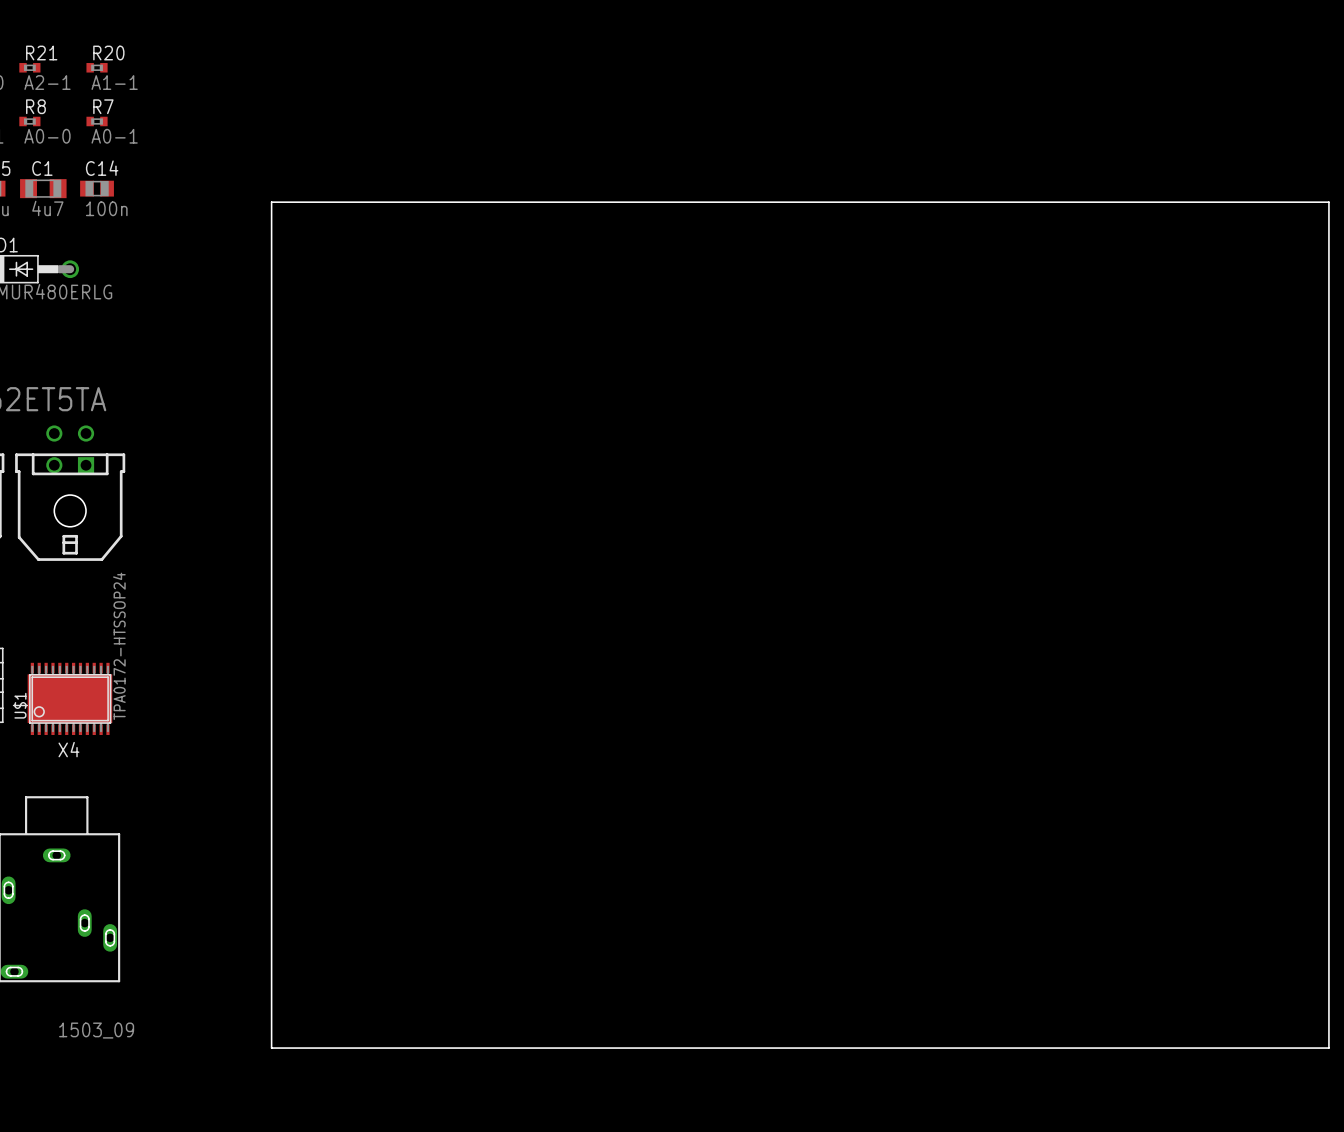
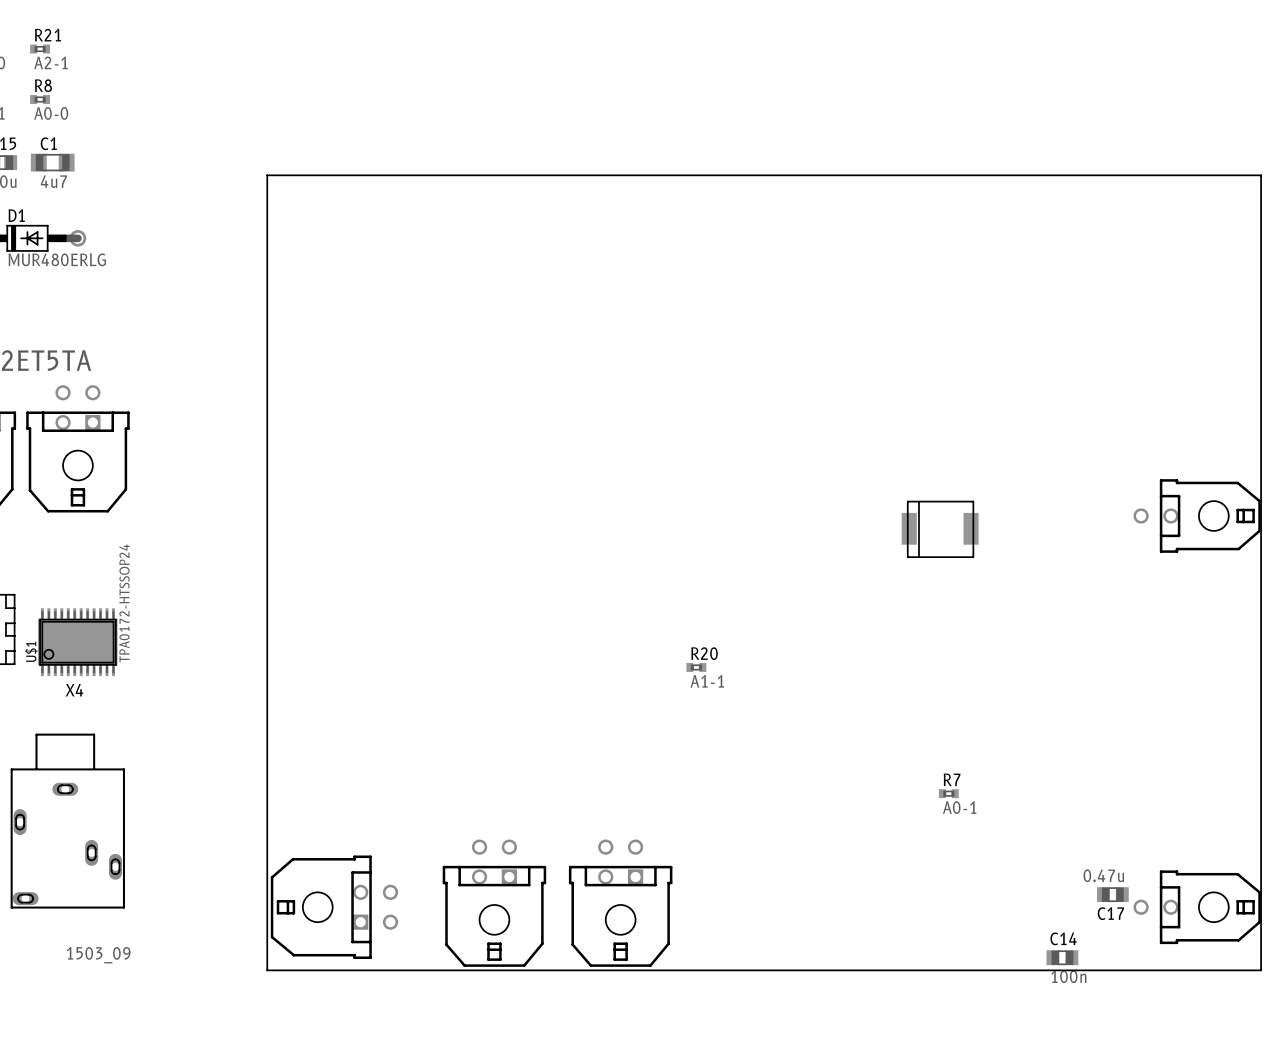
R20 position: (97, 67) -> (696, 667)
R7 position: (97, 121) -> (948, 793)
C14 position: (97, 188) -> (1062, 957)
part: none -> (1197, 516)
part: none -> (940, 529)
C17: none -> 0.47u (1112, 894)
part: none -> (494, 903)
part: none -> (620, 903)
part: none -> (334, 907)
part: none -> (1197, 907)

